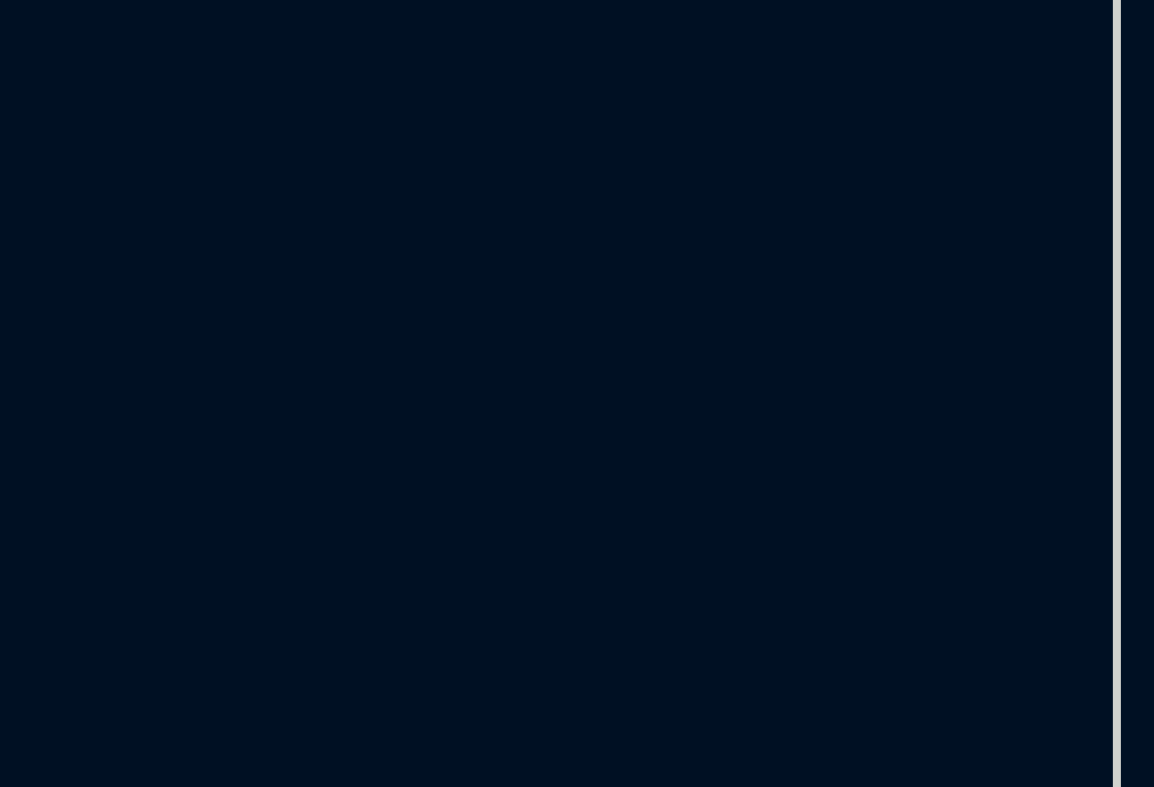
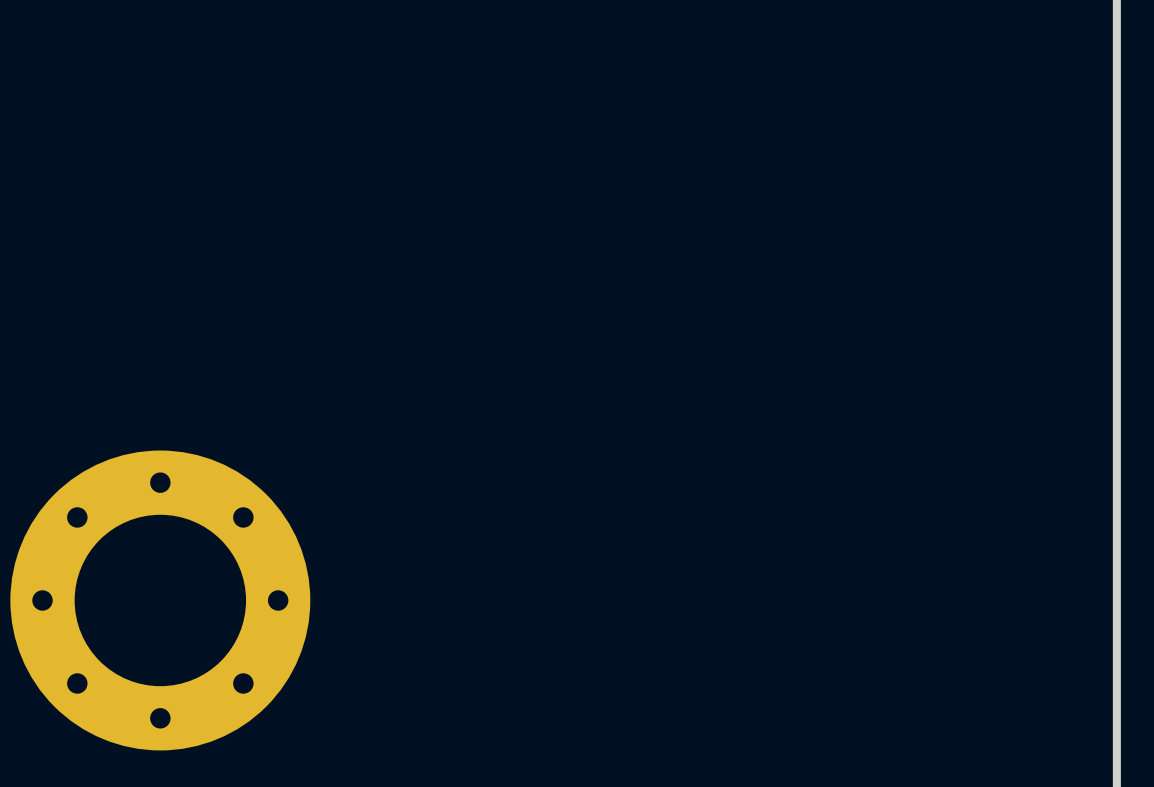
part: none -> (160, 600)

